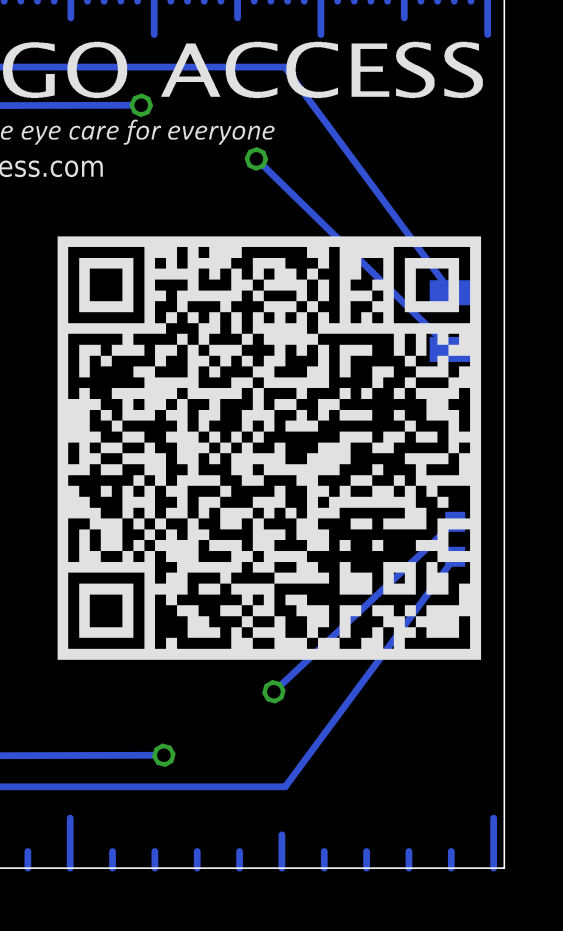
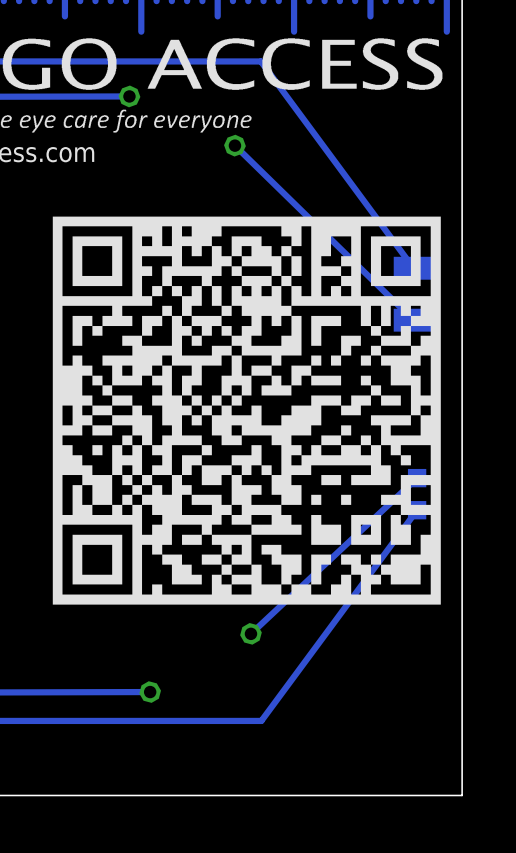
bottom track: (70, 818) (70, 868) -> none
bottom track: (493, 818) (493, 868) -> none
bottom track: (281, 834) (281, 868) -> none
bottom track: (27, 851) (27, 868) -> none
bottom track: (112, 851) (112, 868) -> none
bottom track: (154, 851) (154, 868) -> none
bottom track: (197, 851) (197, 868) -> none
bottom track: (239, 851) (239, 868) -> none
bottom track: (324, 851) (324, 868) -> none
bottom track: (366, 851) (366, 868) -> none
bottom track: (408, 851) (408, 868) -> none
bottom track: (451, 851) (451, 868) -> none

